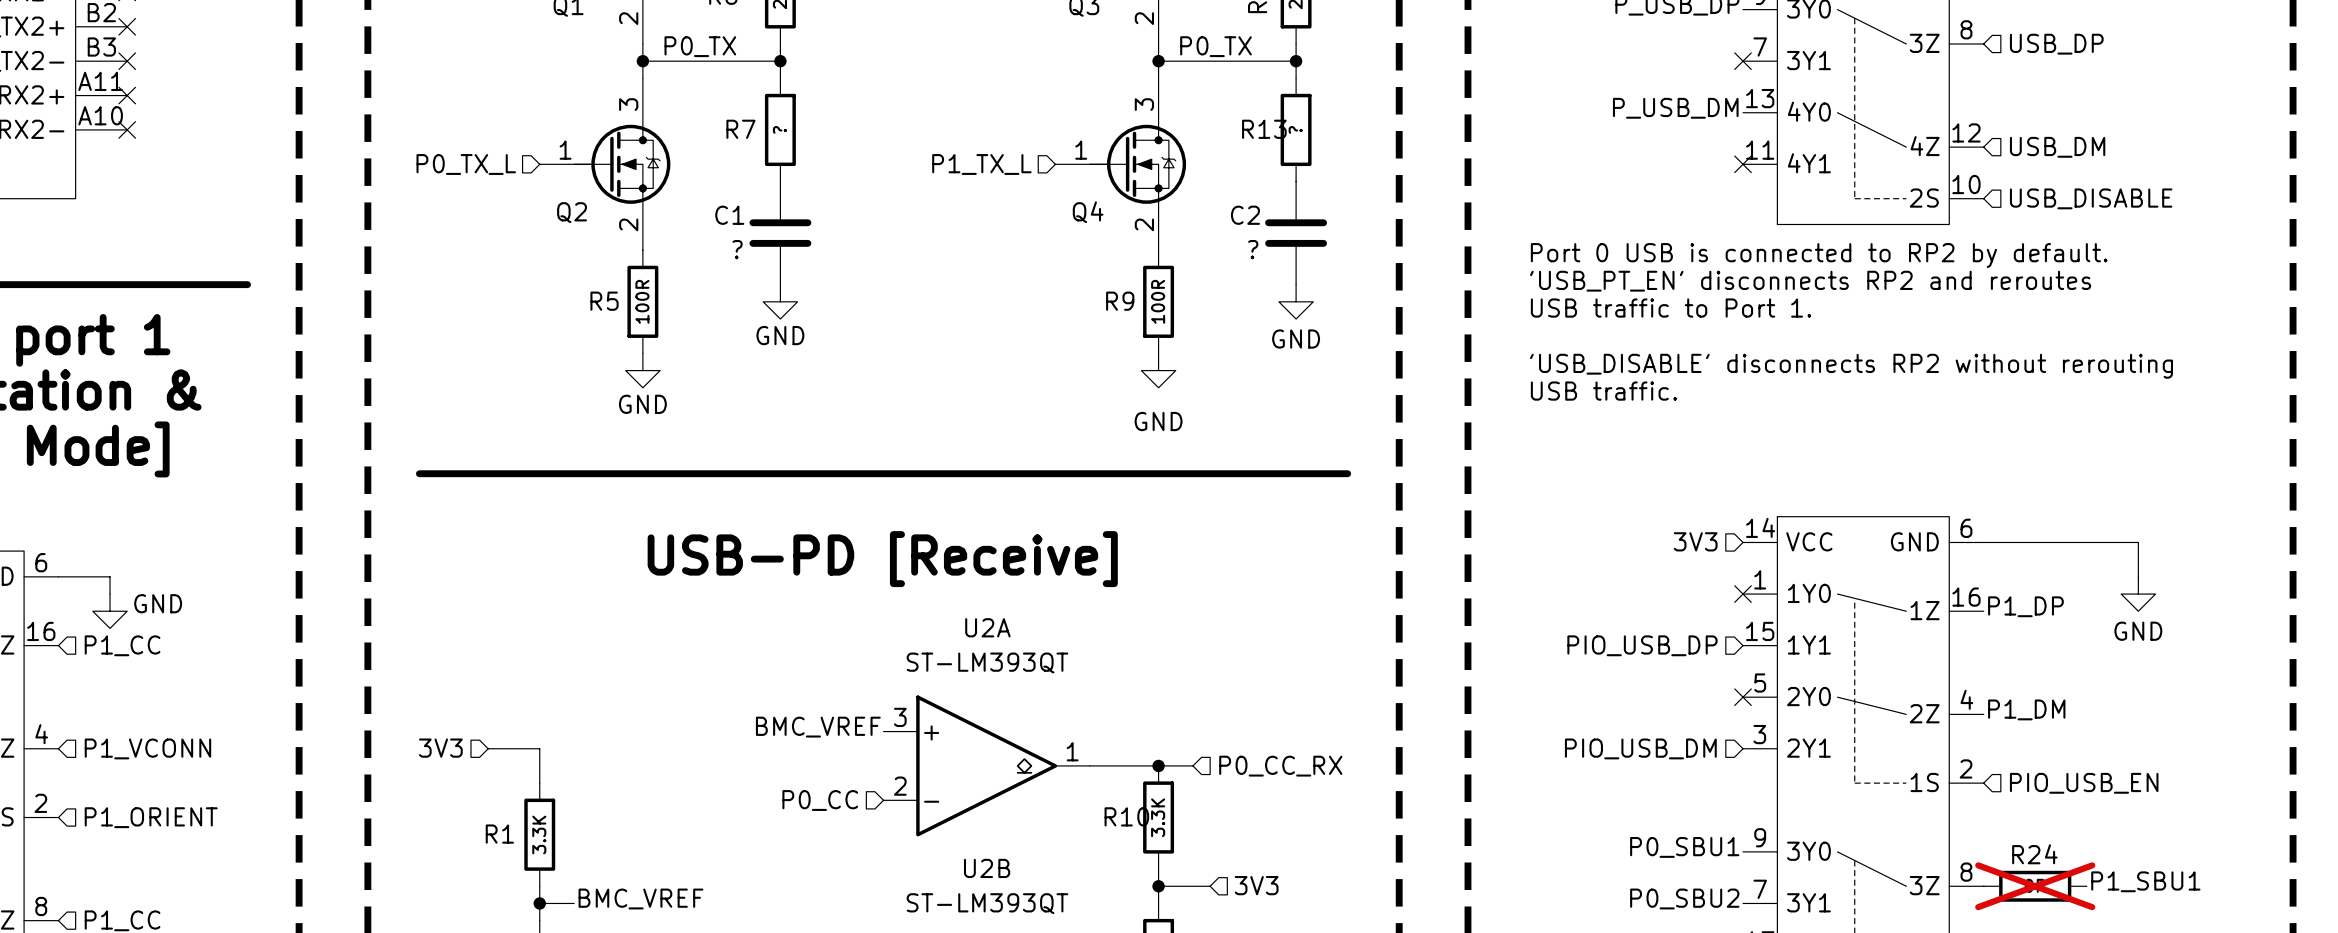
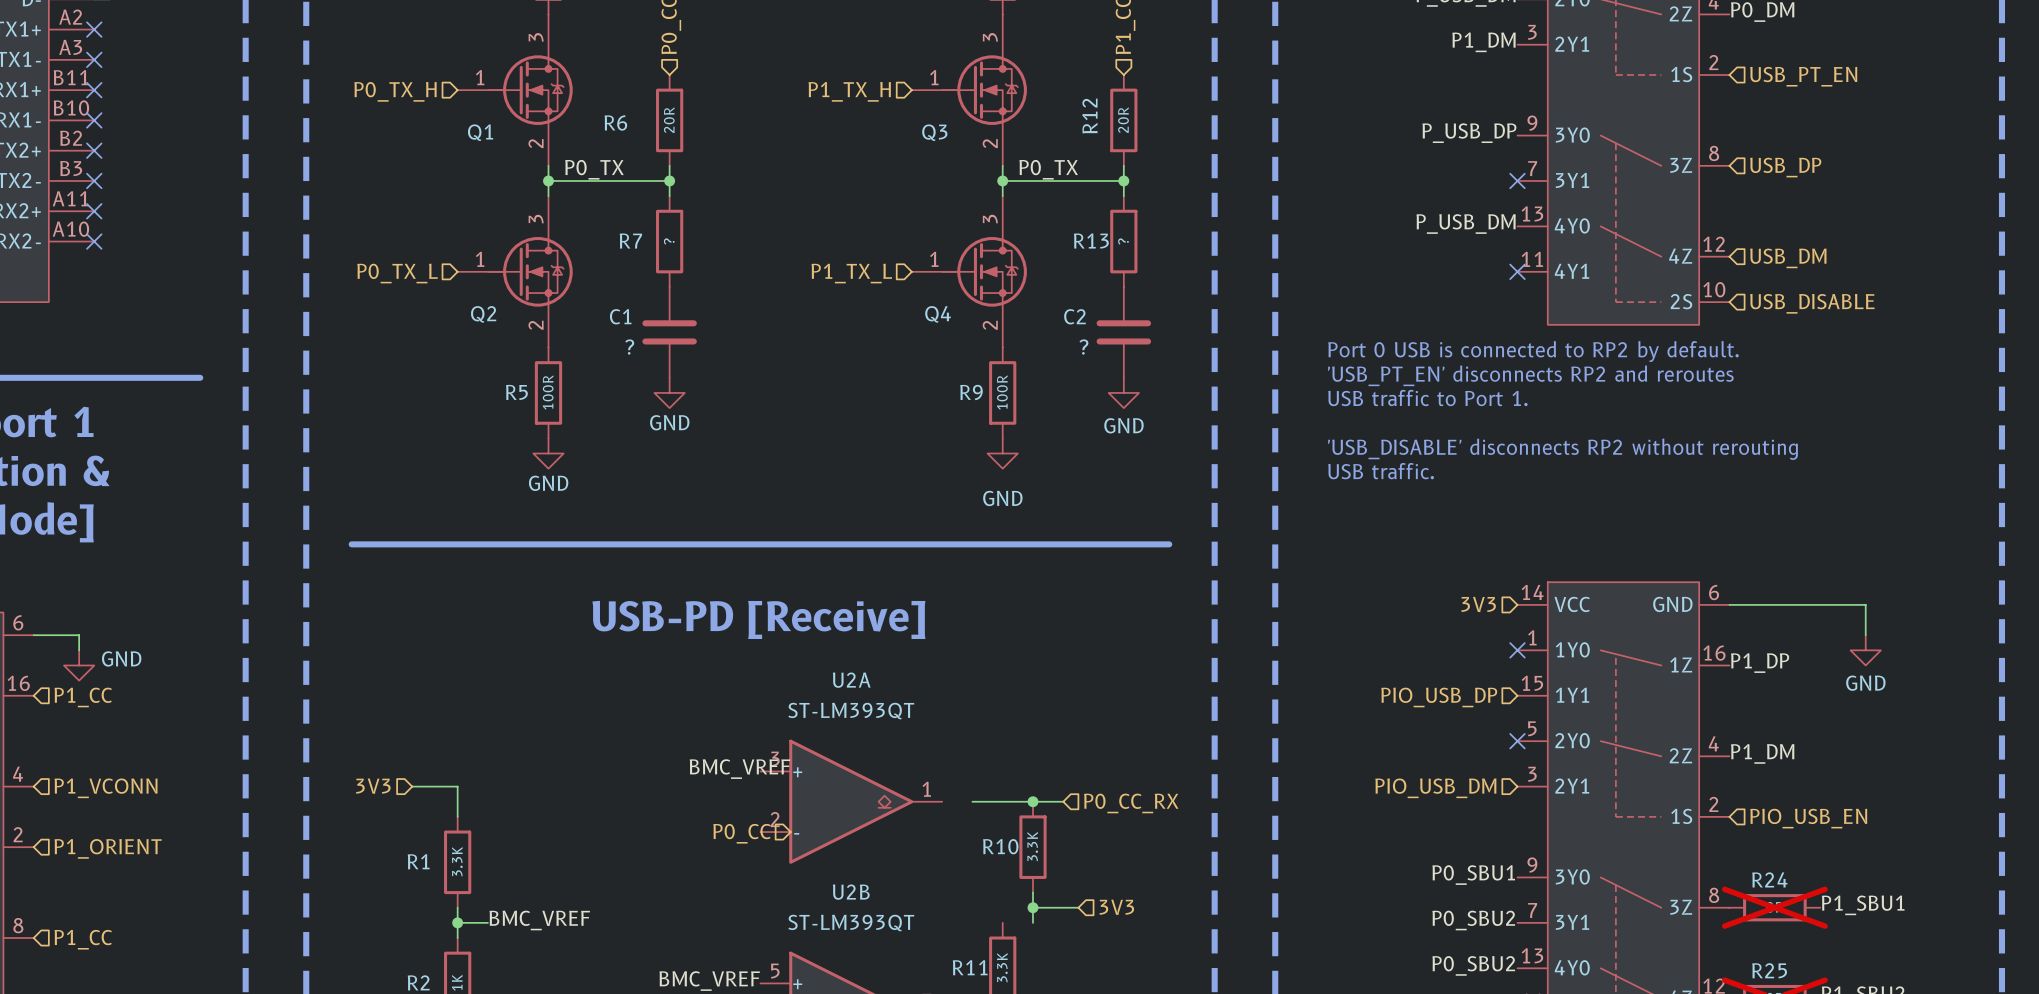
label position: BMC_VREF (818, 727) -> BMC_VREF (739, 769)
wire: (1089, 765) (1124, 765) -> (1032, 801) (1063, 801)
junction position: (1158, 765) -> (1032, 801)
hierarchical label position: P0_CC_RX (1280, 766) -> P0_CC_RX (1131, 803)
hierarchical label position: P0_CC (820, 800) -> P0_CC (742, 833)
R10 position: (1158, 817) -> (1032, 847)
wire: (1158, 869) (1158, 903) -> (1032, 892) (1032, 922)
hierarchical label position: 3V3 (1256, 885) -> 3V3 (1116, 907)
wire: (1158, 886) (1192, 886) -> (1048, 907) (1078, 907)
junction position: (1158, 886) -> (1032, 907)

